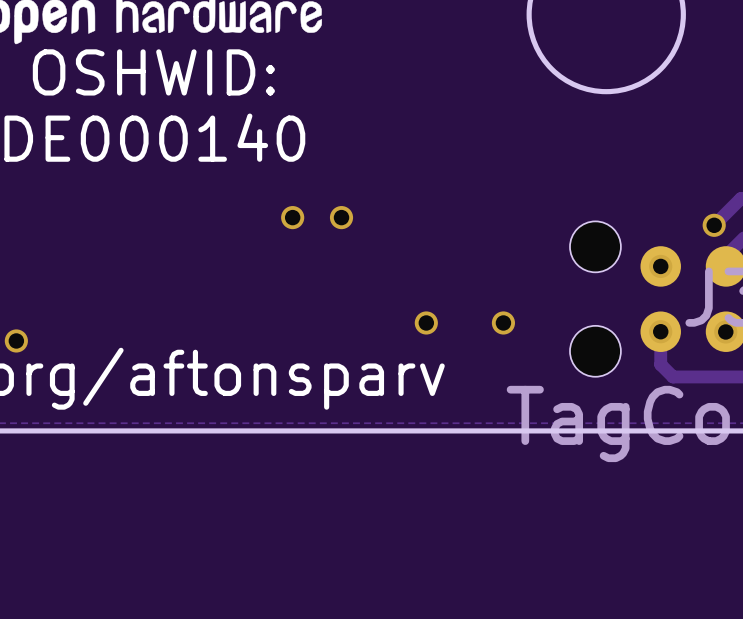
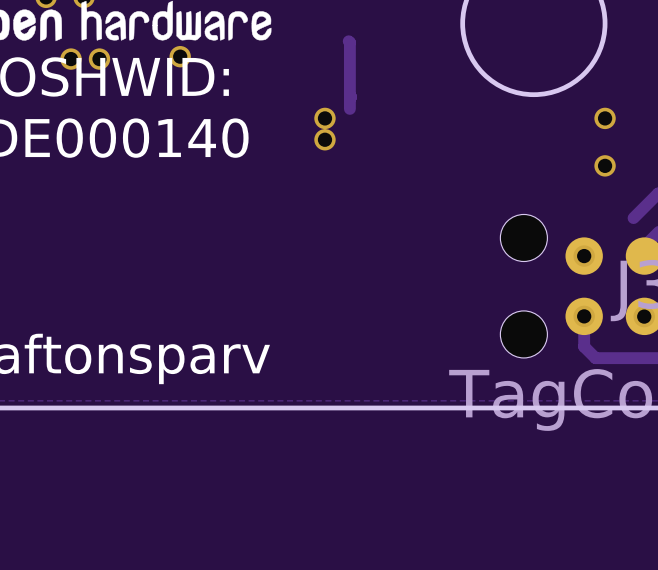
track: none -> (348, 41) (349, 108)
via: none -> (180, 56)
via: none -> (71, 59)
via: none -> (99, 59)
via: none -> (324, 118)
via: none -> (605, 118)
via: none -> (324, 139)
via: none -> (605, 165)
via: (292, 217) -> none
via: (341, 217) -> none
via: (714, 225) -> none
via: (426, 322) -> none
via: (503, 322) -> none

